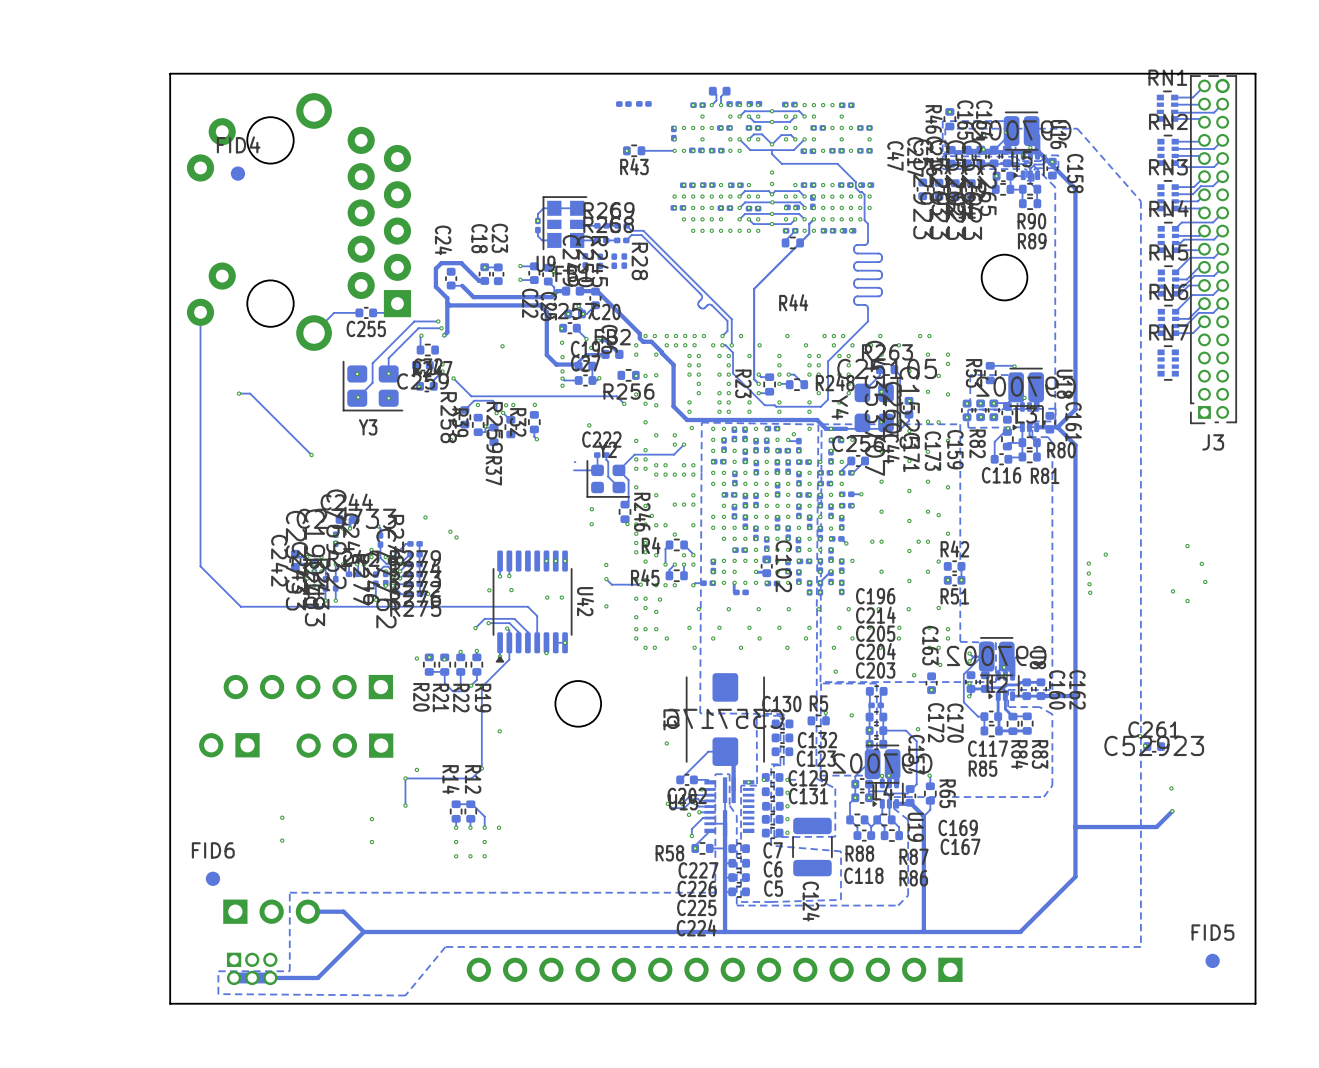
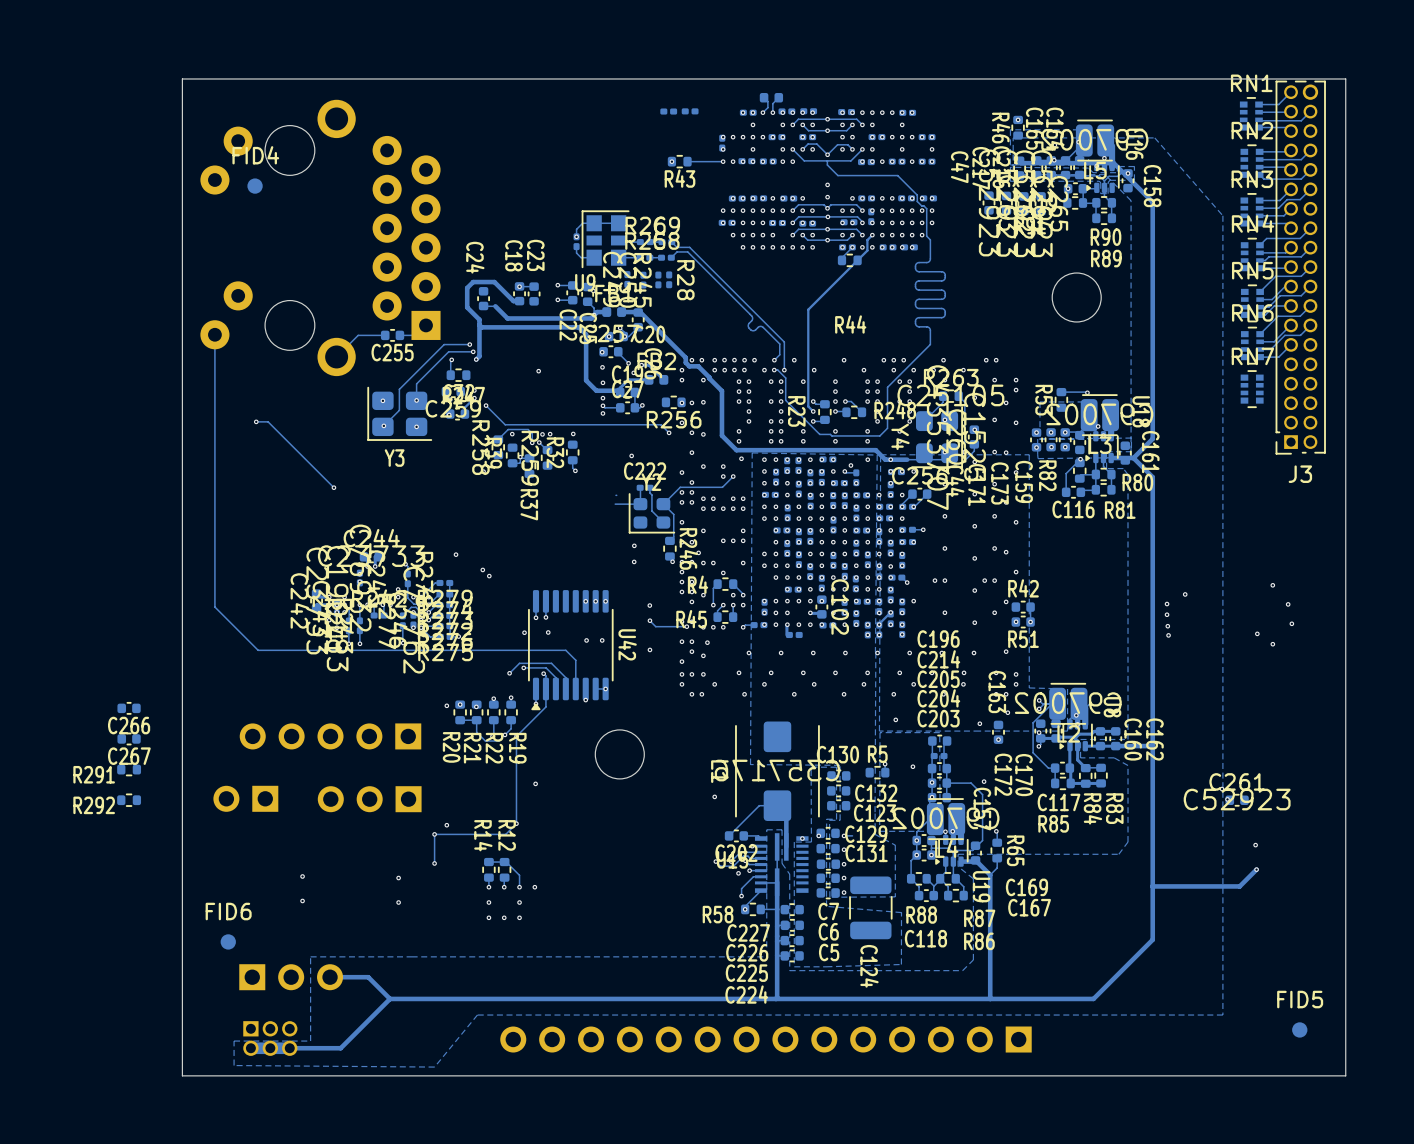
C266: none -> (129, 708)
C267: none -> (129, 738)
R291: none -> (129, 769)
R292: none -> (129, 800)

